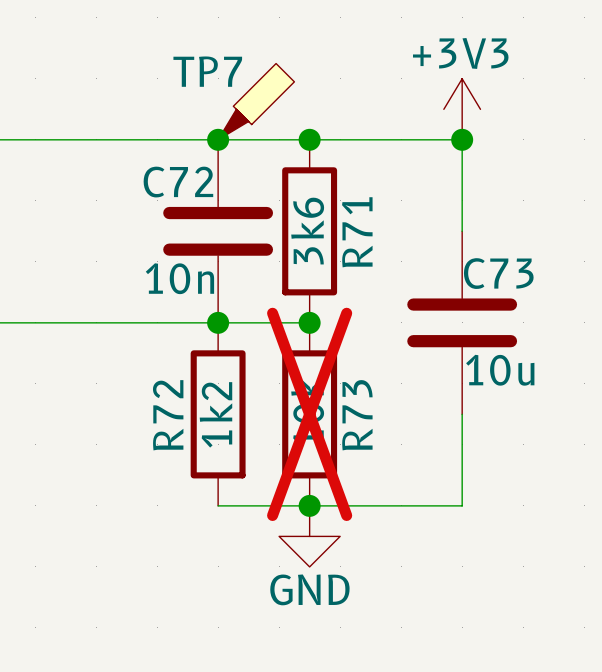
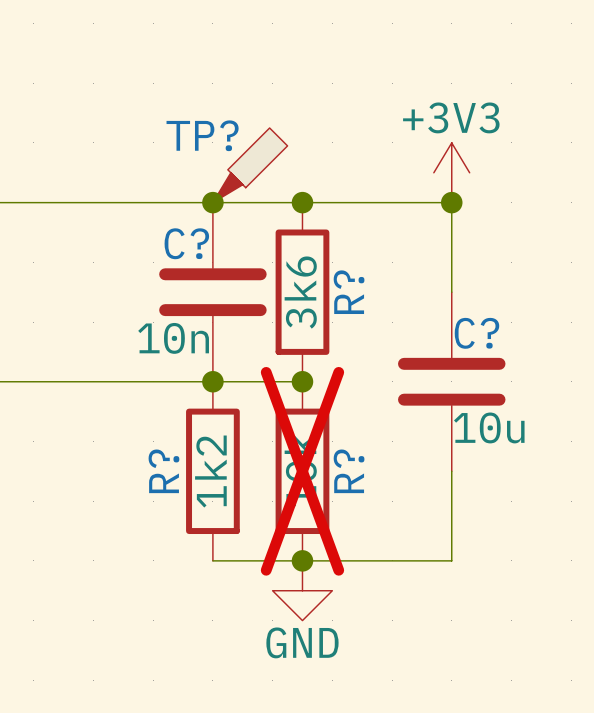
TP7 name: TP7 (207, 71) -> TP? (202, 135)
C72 name: C72 (178, 182) -> C? (186, 243)
R71 name: R71 (357, 232) -> R? (349, 292)
C73 name: C73 (498, 273) -> C? (476, 333)
R72 name: R72 (168, 415) -> R? (163, 471)
R73 name: R73 (357, 415) -> R? (349, 471)

